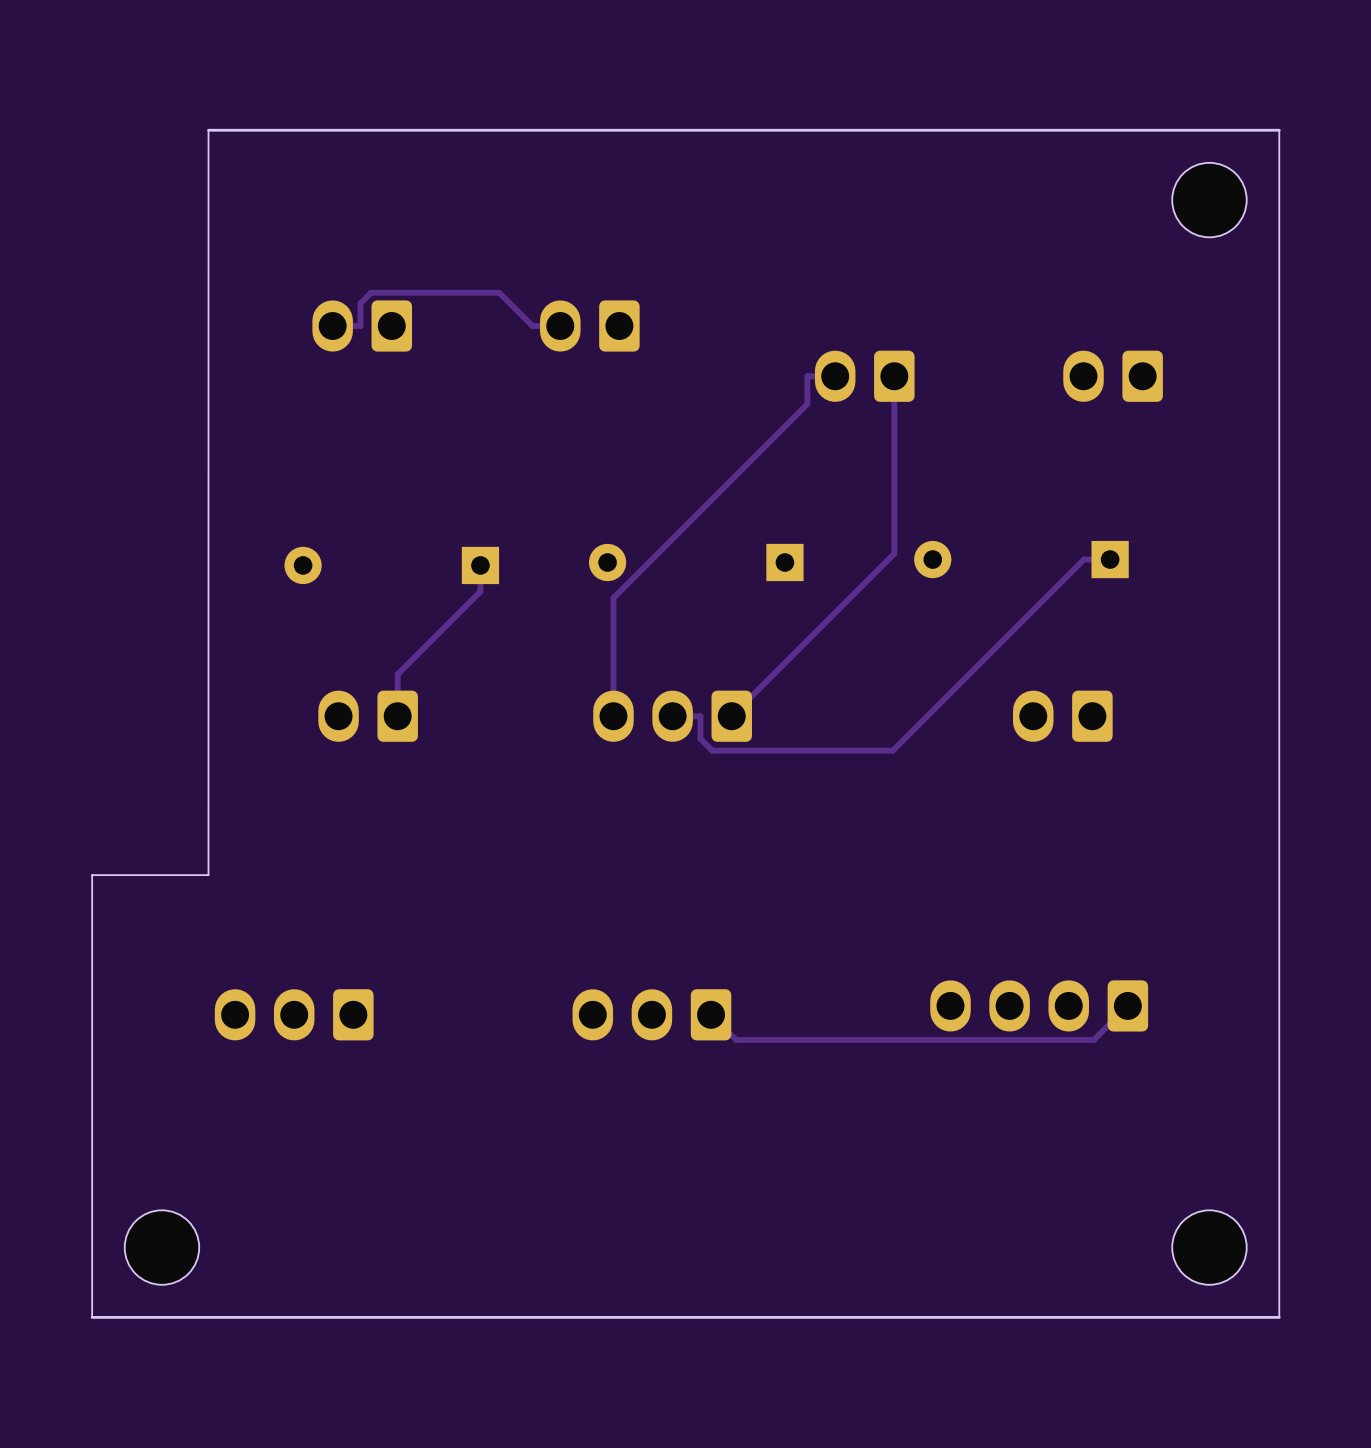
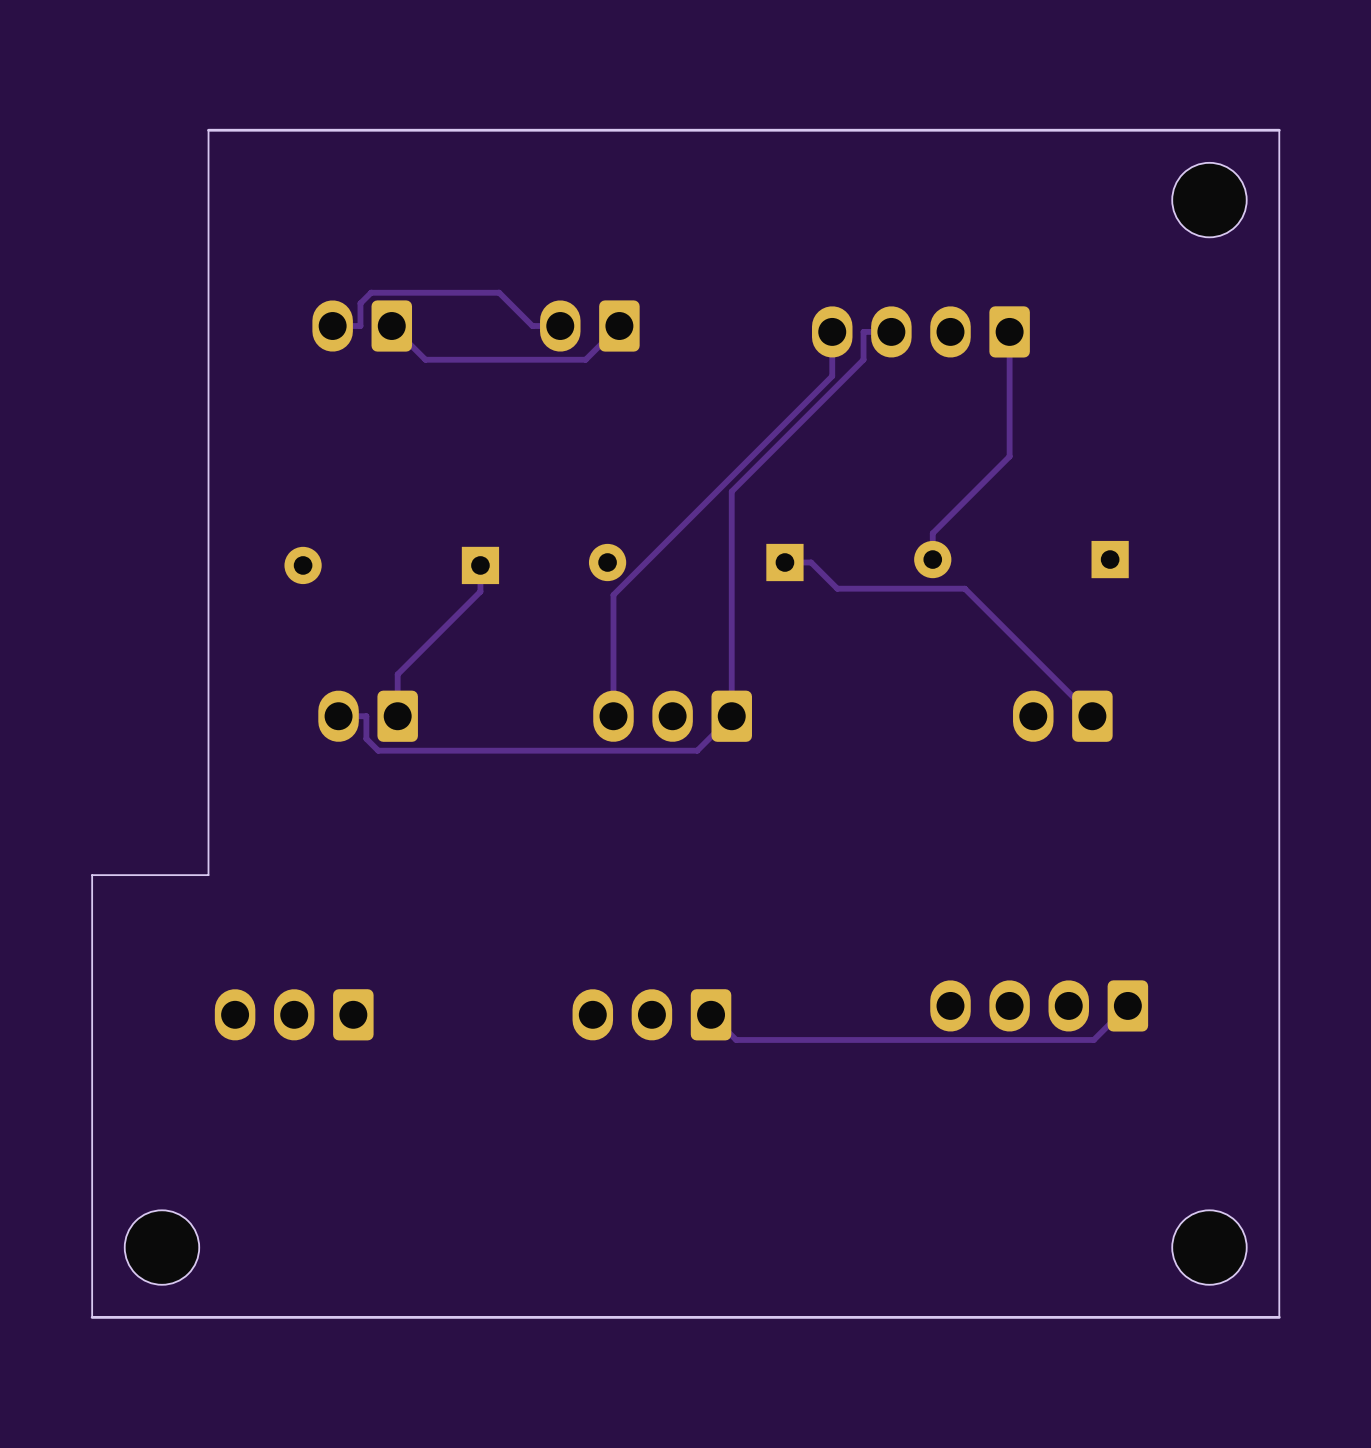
track: none -> (619, 326) (585, 359) (425, 359) (391, 326)
track: none -> (891, 331) (863, 331) (863, 359) (731, 491) (731, 716) (697, 750) (378, 750) (366, 738) (366, 716) (338, 716)
part: none -> (920, 331)
track: none -> (1009, 331) (1009, 456) (932, 533) (932, 559)
track: (835, 376) (807, 376) (807, 404) (613, 597) -> (832, 331) (832, 376) (613, 594) (613, 597)
part: (864, 376) -> none
track: (894, 376) (894, 553) (731, 716) -> none
part: (1113, 376) -> none
track: (1110, 559) (1083, 559) (892, 750) (712, 750) (700, 738) (700, 716) (672, 716) -> none
track: none -> (784, 562) (811, 562) (837, 588) (964, 588) (1092, 716)

